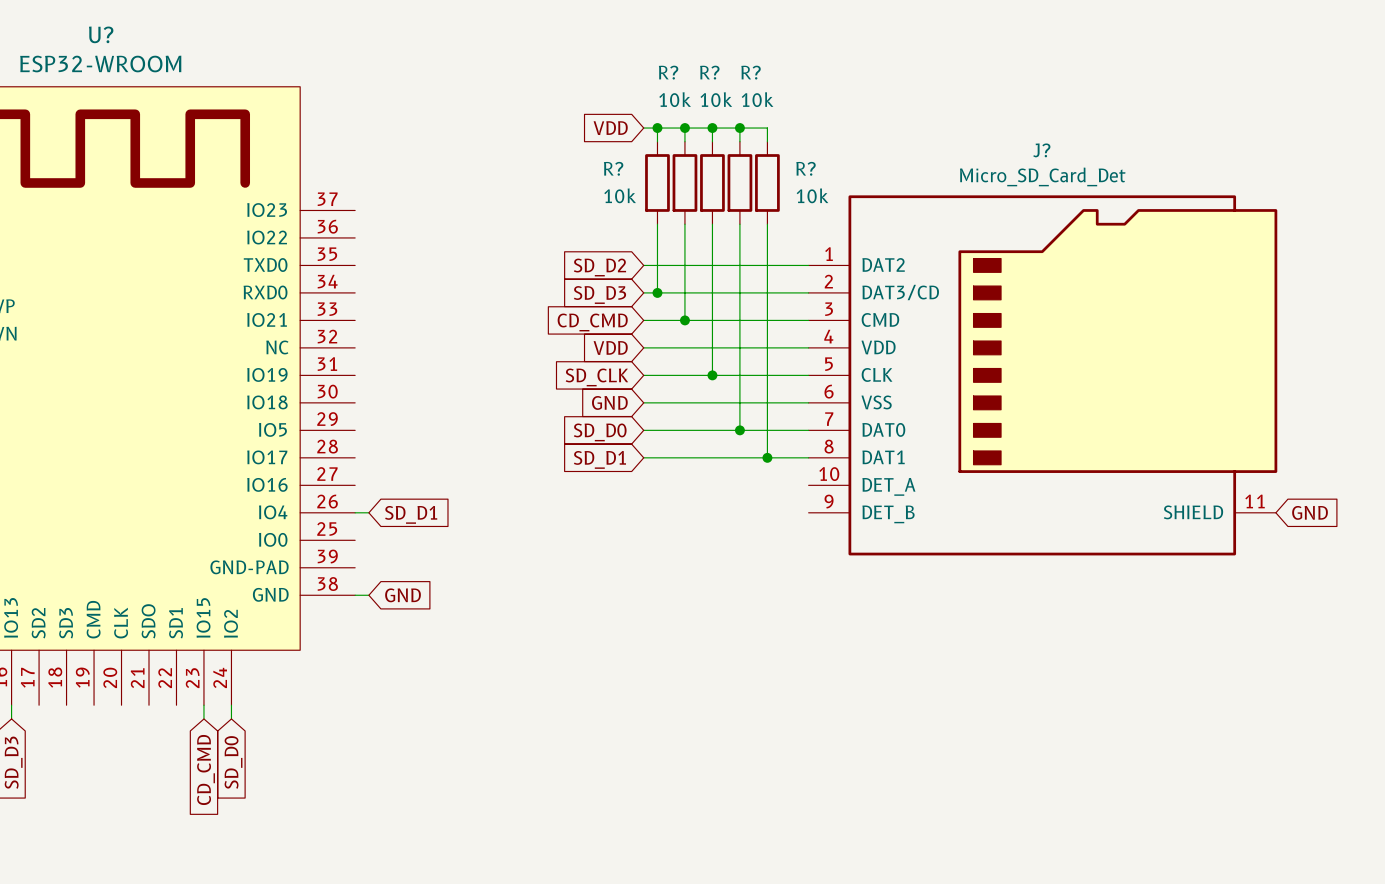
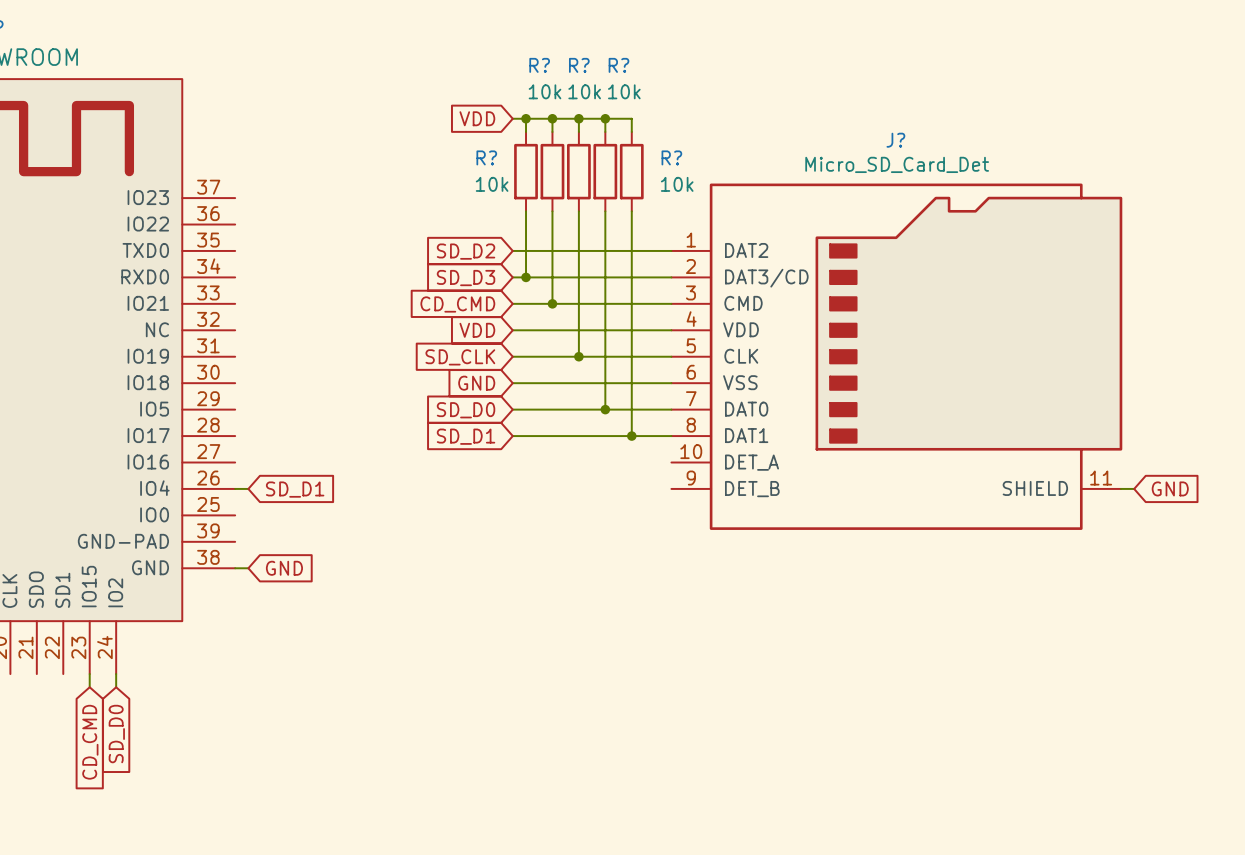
wire: none -> (1120, 488) (1134, 488)
global label position: GND (1310, 512) -> GND (1170, 488)

